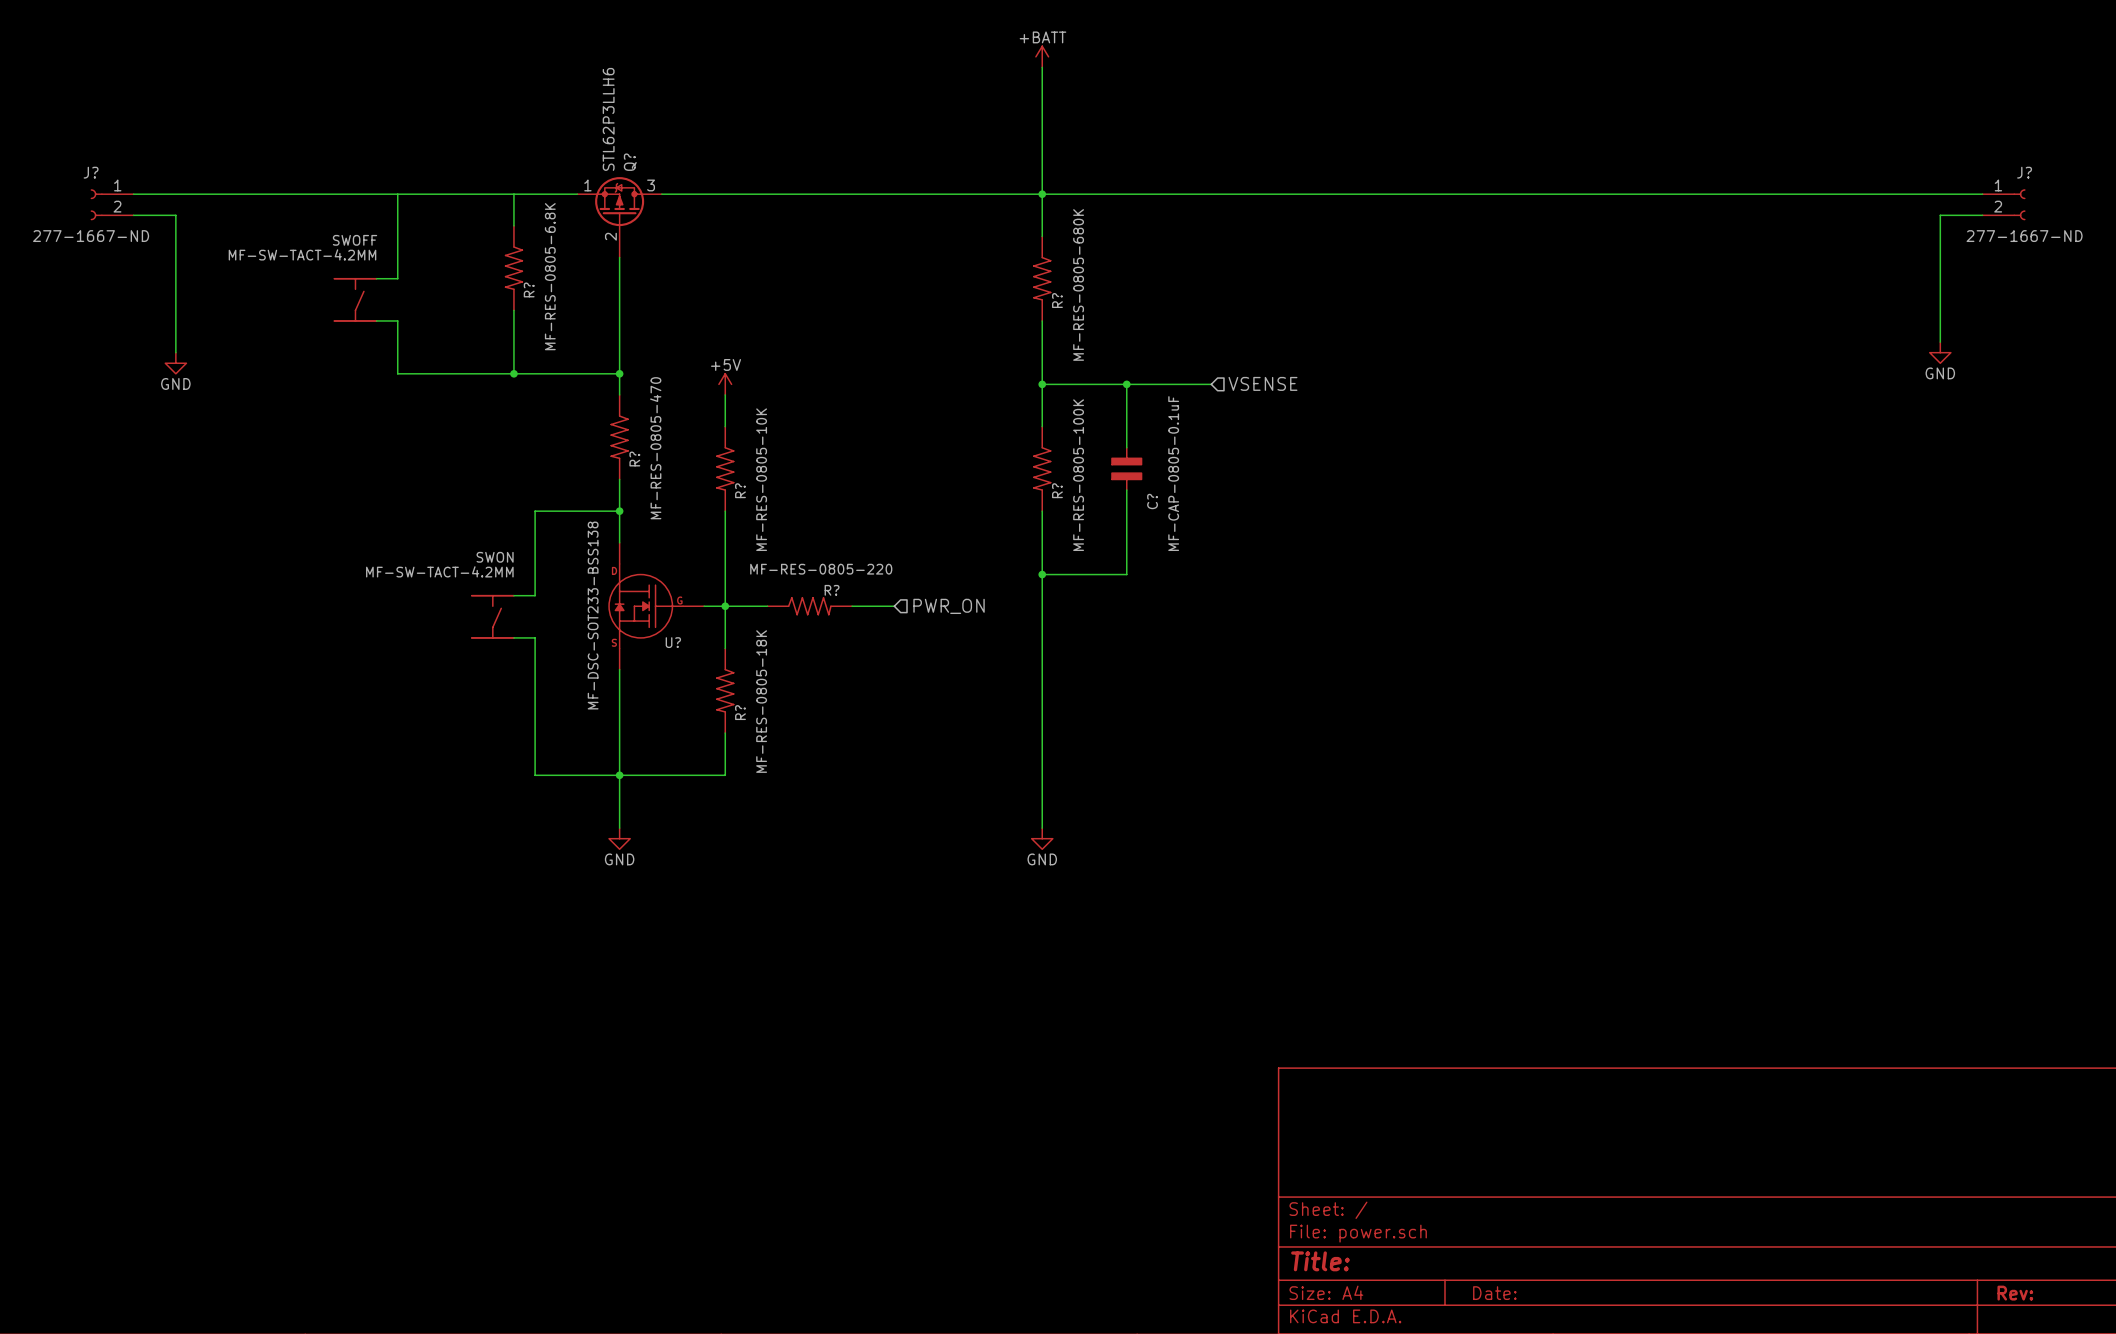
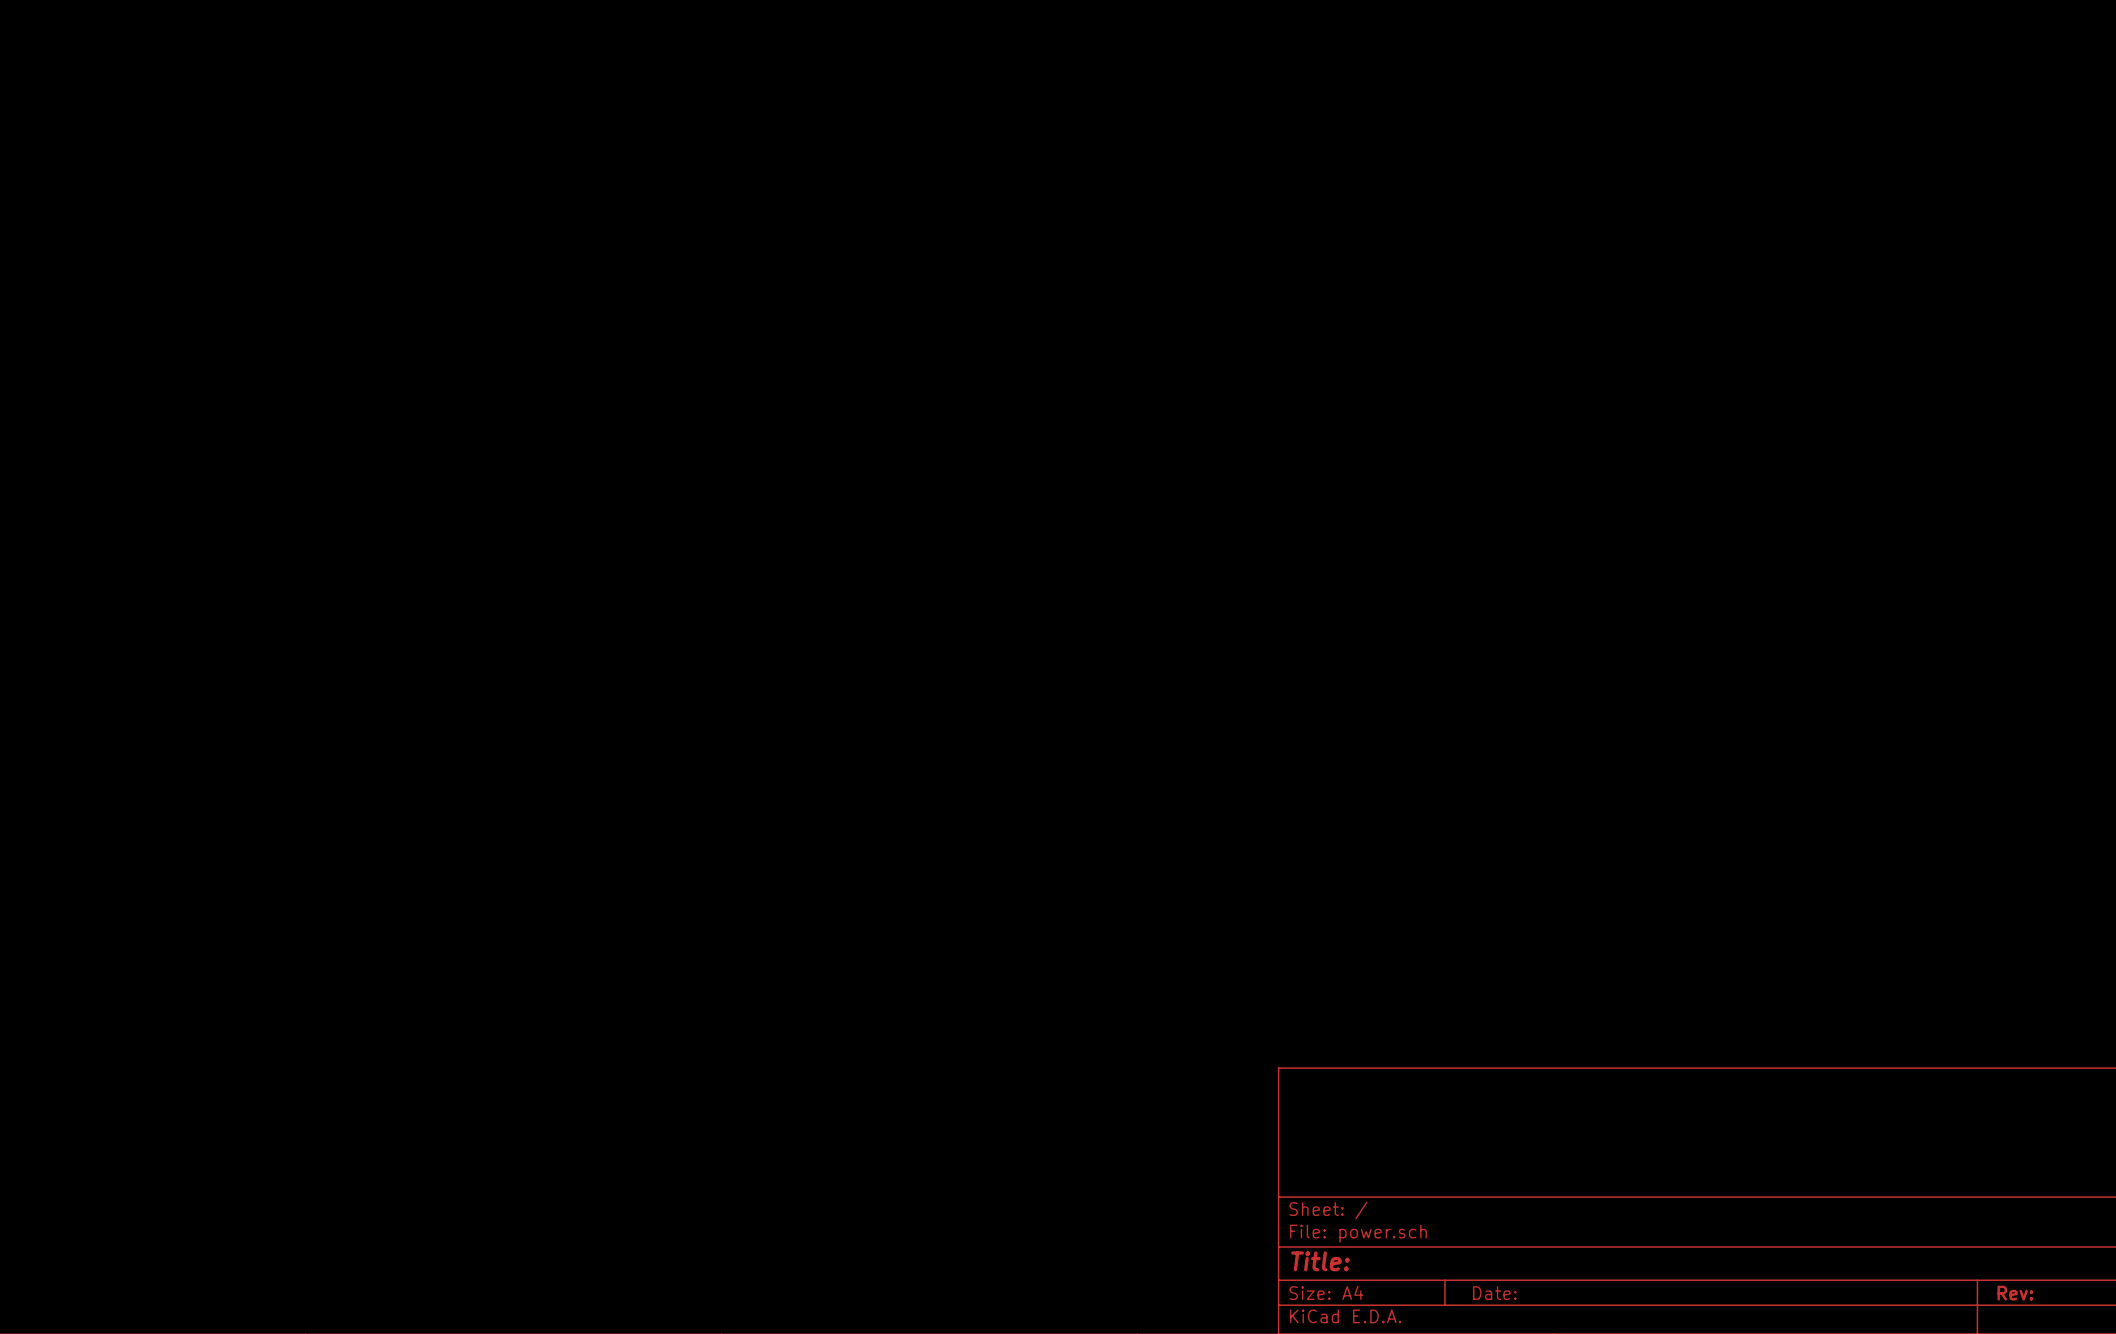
power symbol: +BATT (1042, 56) -> none
wire: (1042, 67) (1042, 236) -> none
wire: (133, 194) (577, 194) -> none
wire: (397, 194) (397, 278) (376, 278) -> none
wire: (513, 194) (513, 225) -> none
wire: (661, 194) (1982, 194) -> none
junction: (1042, 194) -> none
J?: 277-1667-ND (112, 204) -> none
J?: 277-1667-ND (2004, 204) -> none
wire: (133, 215) (175, 215) (175, 352) -> none
wire: (1982, 215) (1940, 215) (1940, 342) -> none
Q?: STL62P3LLH6 (619, 217) -> none
wire: (619, 257) (619, 394) -> none
R?: MF-RES-0805-6.8K (513, 268) -> none
R?: MF-RES-0805-680K (1042, 278) -> none
SWOFF: MF-SW-TACT-4.2MM (355, 299) -> none
wire: (513, 310) (513, 373) -> none
wire: (376, 320) (397, 320) (397, 373) (619, 373) -> none
wire: (1042, 320) (1042, 426) -> none
power symbol: GND (1940, 352) -> none
power symbol: GND (175, 363) -> none
junction: (513, 373) -> none
junction: (619, 373) -> none
hierarchical label: VSENSE (1262, 383) -> none
power symbol: +5V (725, 384) -> none
wire: (1042, 384) (1211, 384) -> none
junction: (1042, 384) -> none
wire: (1126, 384) (1126, 447) -> none
junction: (1126, 384) -> none
wire: (725, 394) (725, 426) -> none
R?: MF-RES-0805-470 (619, 437) -> none
R?: MF-RES-0805-10K (725, 468) -> none
R?: MF-RES-0805-100K (1042, 468) -> none
C?: MF-CAP-0805-0.1uF (1126, 468) -> none
wire: (619, 479) (619, 542) -> none
wire: (1126, 490) (1126, 574) (1042, 574) -> none
wire: (619, 511) (535, 511) (535, 595) (513, 595) -> none
junction: (619, 511) -> none
wire: (725, 511) (725, 648) -> none
wire: (1042, 511) (1042, 828) -> none
junction: (1042, 574) -> none
U?: MF-DSC-SOT233-BSS138 (656, 606) -> none
wire: (704, 606) (767, 606) -> none
junction: (725, 606) -> none
R?: MF-RES-0805-220 (809, 606) -> none
wire: (852, 606) (894, 606) -> none
hierarchical label: PWR_ON (949, 606) -> none
SWON: MF-SW-TACT-4.2MM (492, 616) -> none
wire: (513, 637) (535, 637) (535, 775) (725, 775) (725, 733) -> none
wire: (619, 669) (619, 828) -> none
R?: MF-RES-0805-18K (725, 690) -> none
junction: (619, 775) -> none
power symbol: GND (619, 838) -> none
power symbol: GND (1042, 838) -> none

